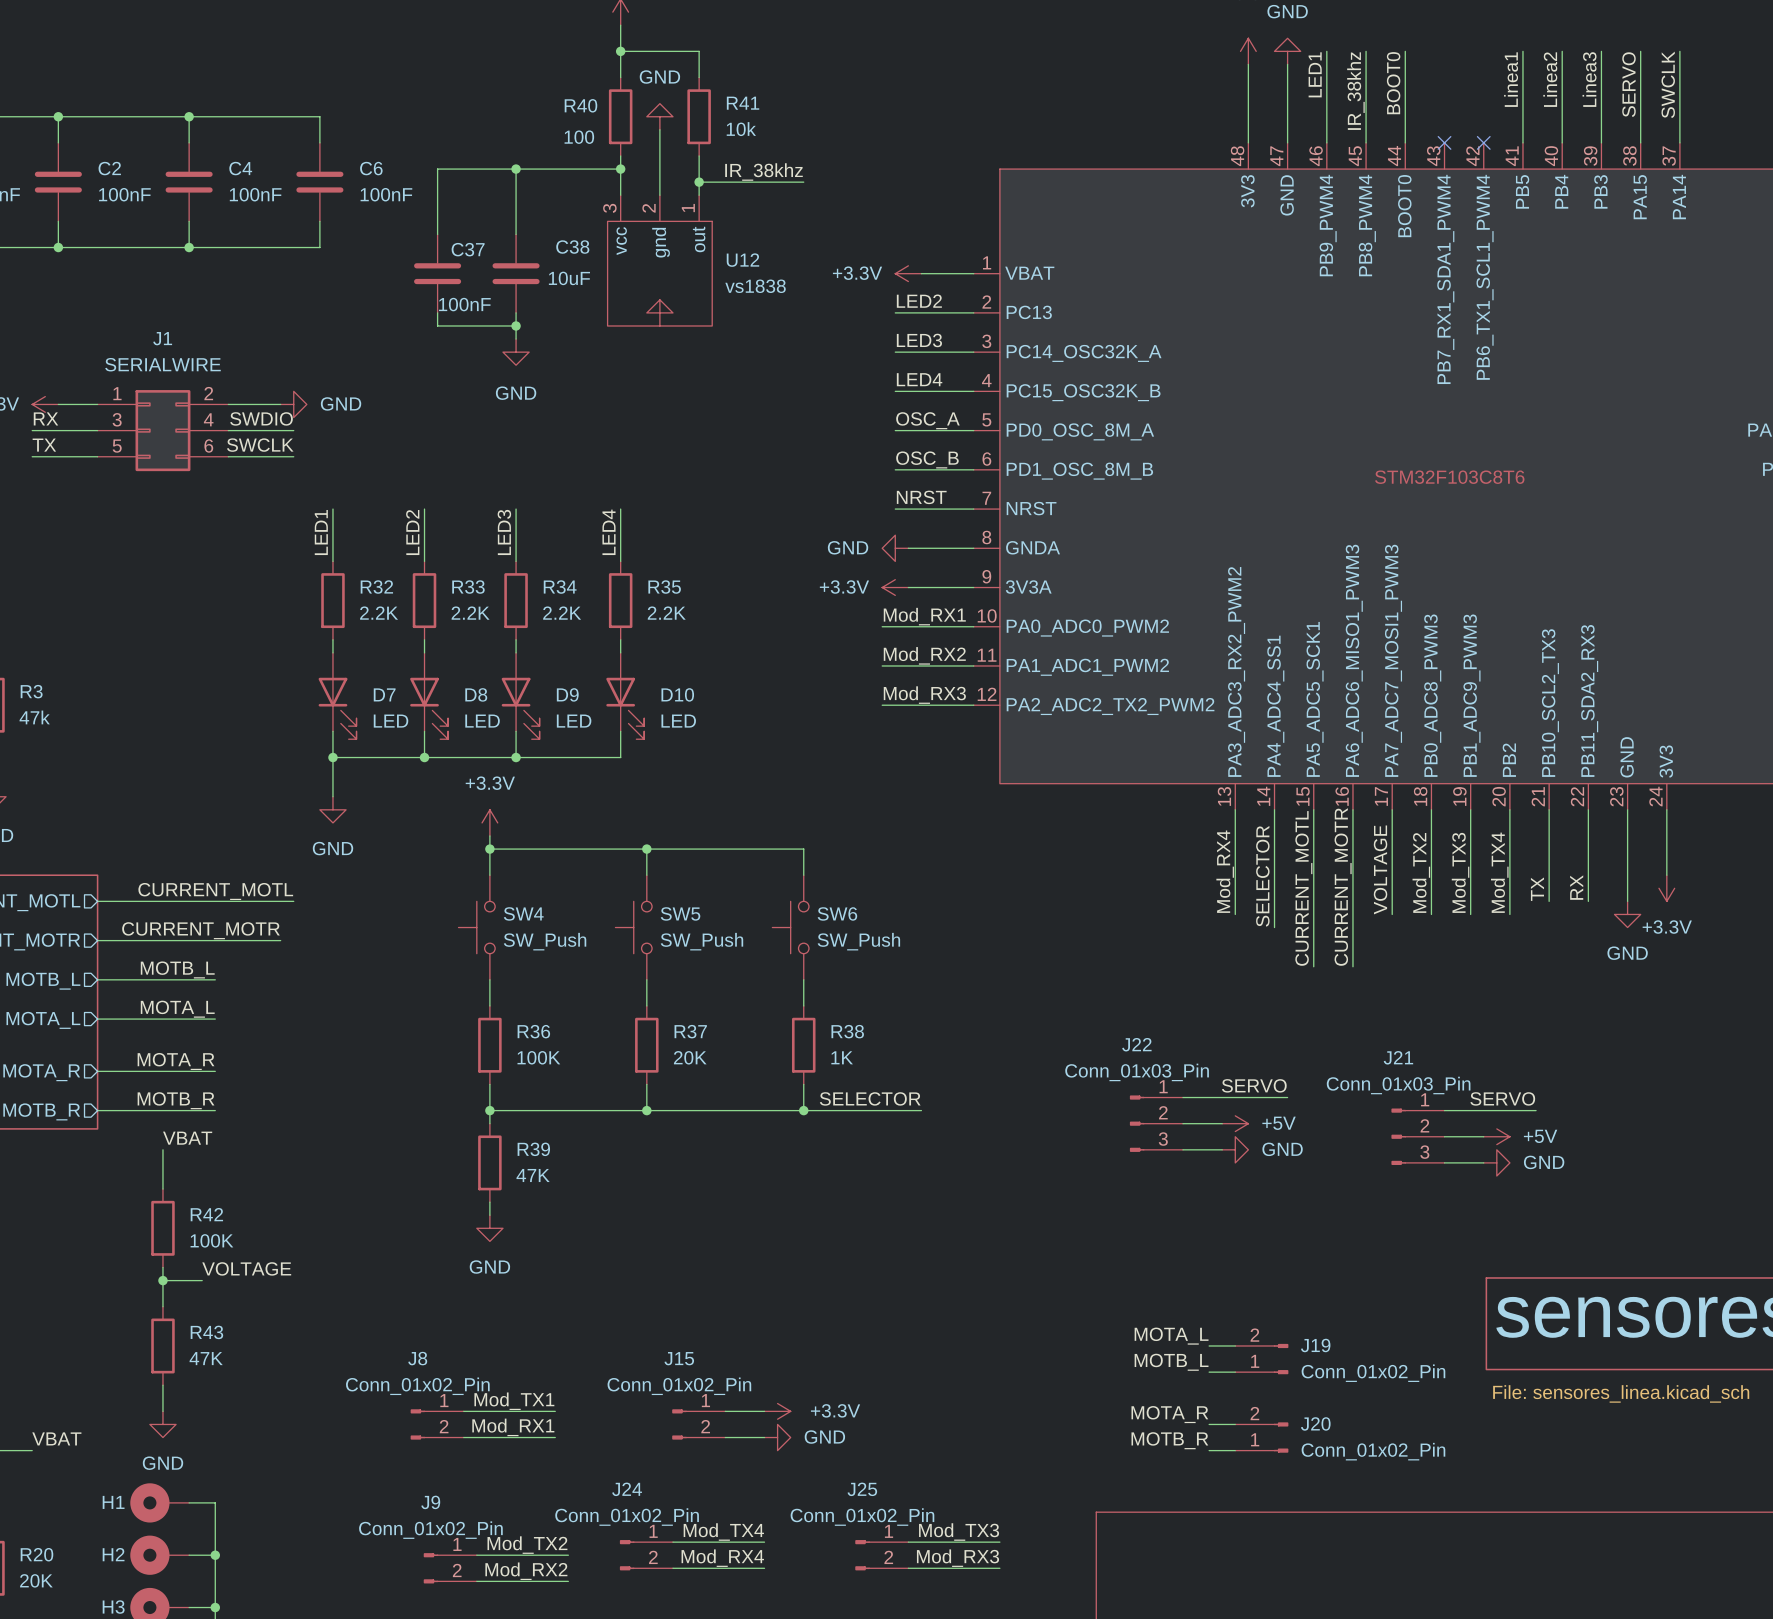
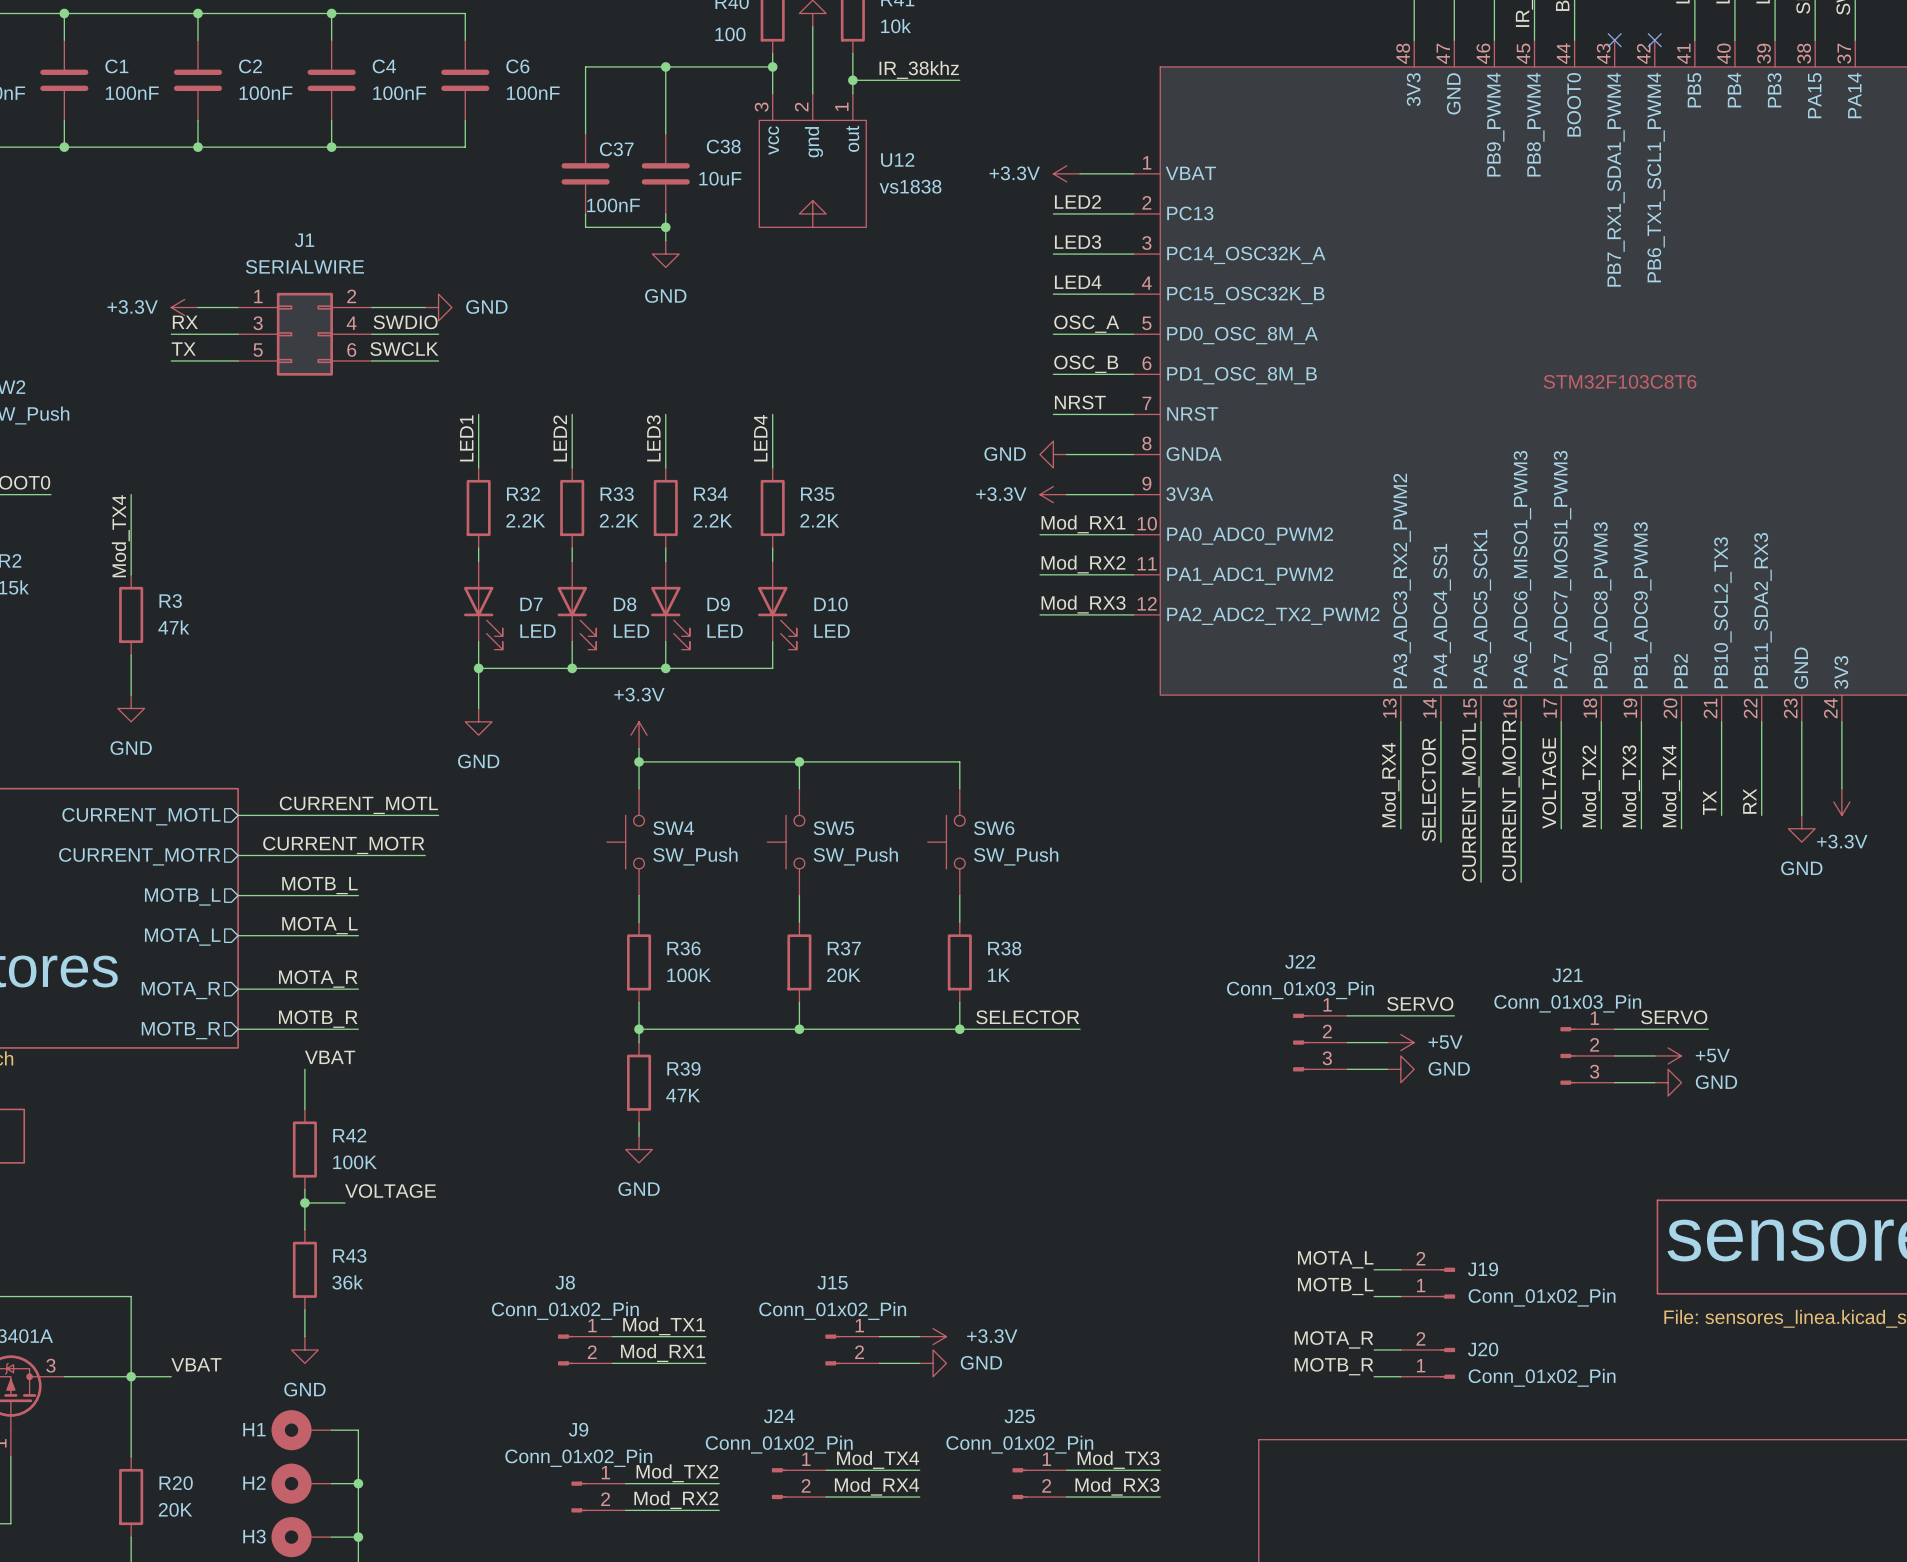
R43 value: 47K (206, 1358) -> 36k (347, 1282)

